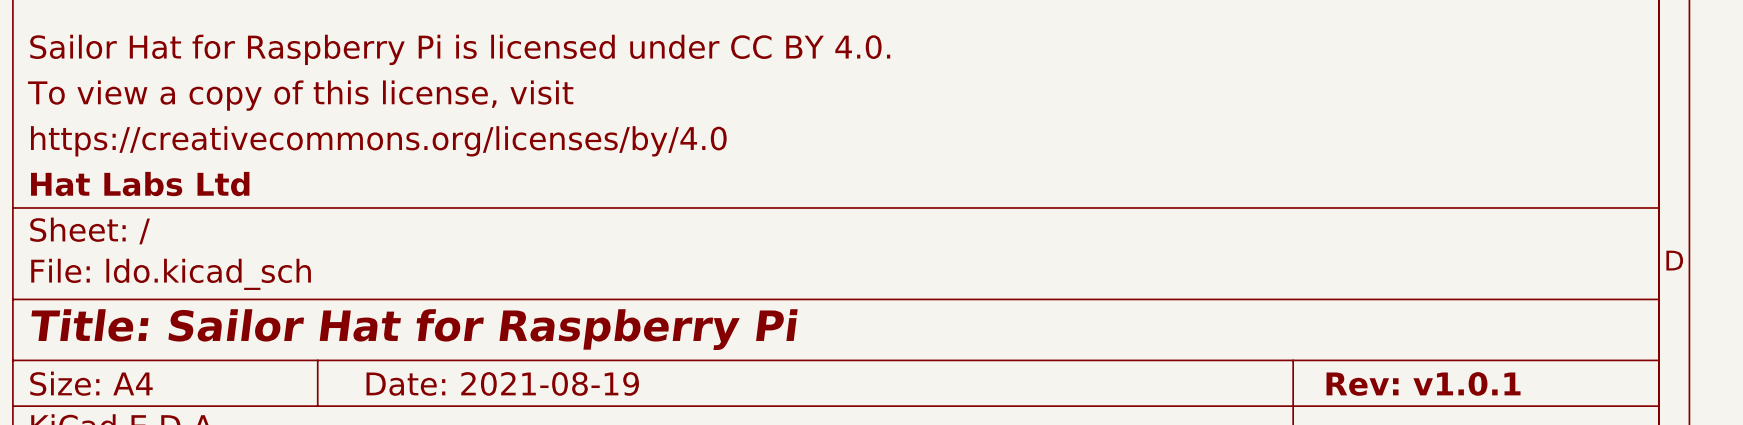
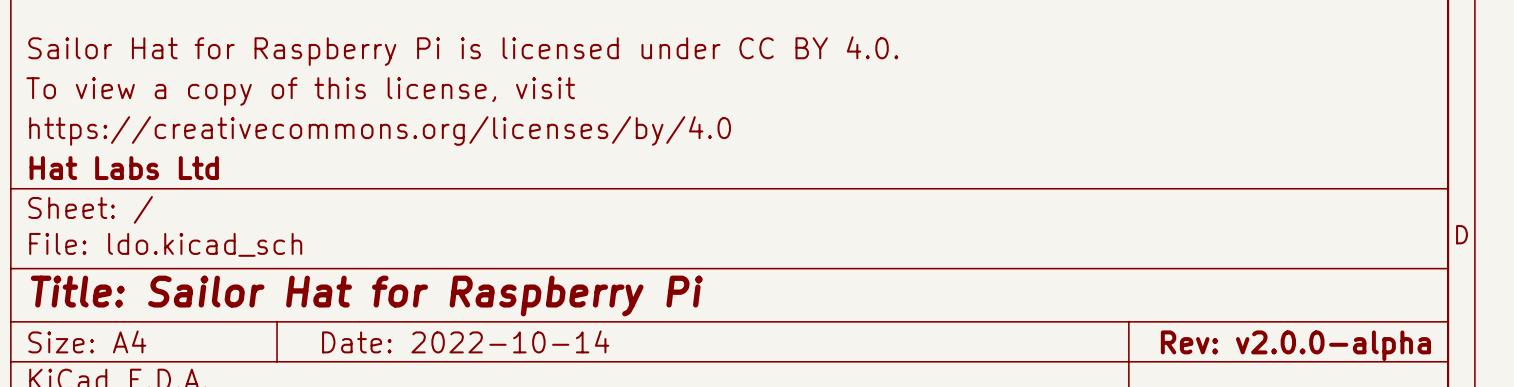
title block: Date: 2021-08-19 (502, 383) -> Date: 2022-10-14 (465, 341)
title block: Rev: v1.0.1 (1423, 383) -> Rev: v2.0.0-alpha (1295, 345)

